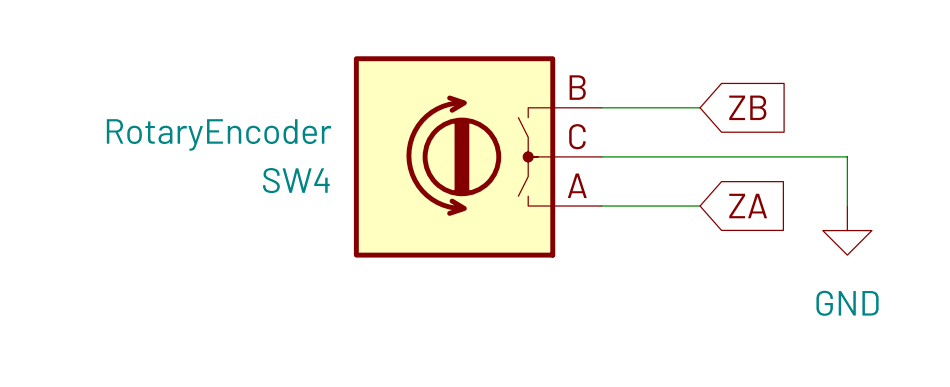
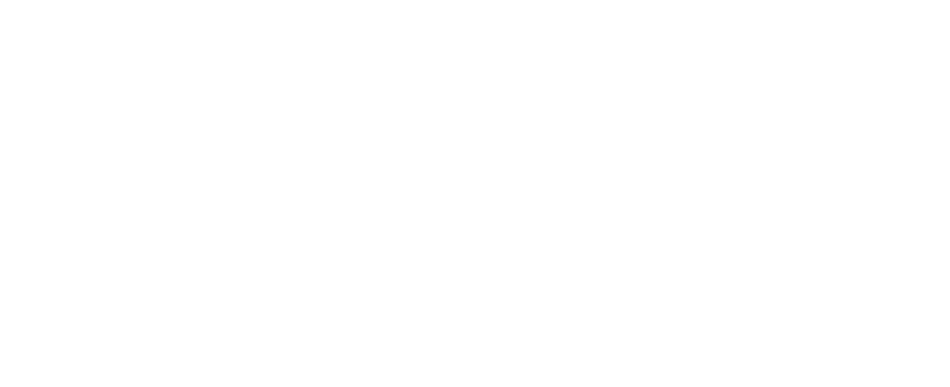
wire: (601, 107) (700, 107) -> none
global label: ZB (747, 107) -> none
SW4: RotaryEncoder (477, 156) -> none
wire: (601, 156) (847, 156) (847, 206) -> none
wire: (601, 206) (700, 206) -> none
global label: ZA (748, 206) -> none
power symbol: GND (847, 230) -> none

